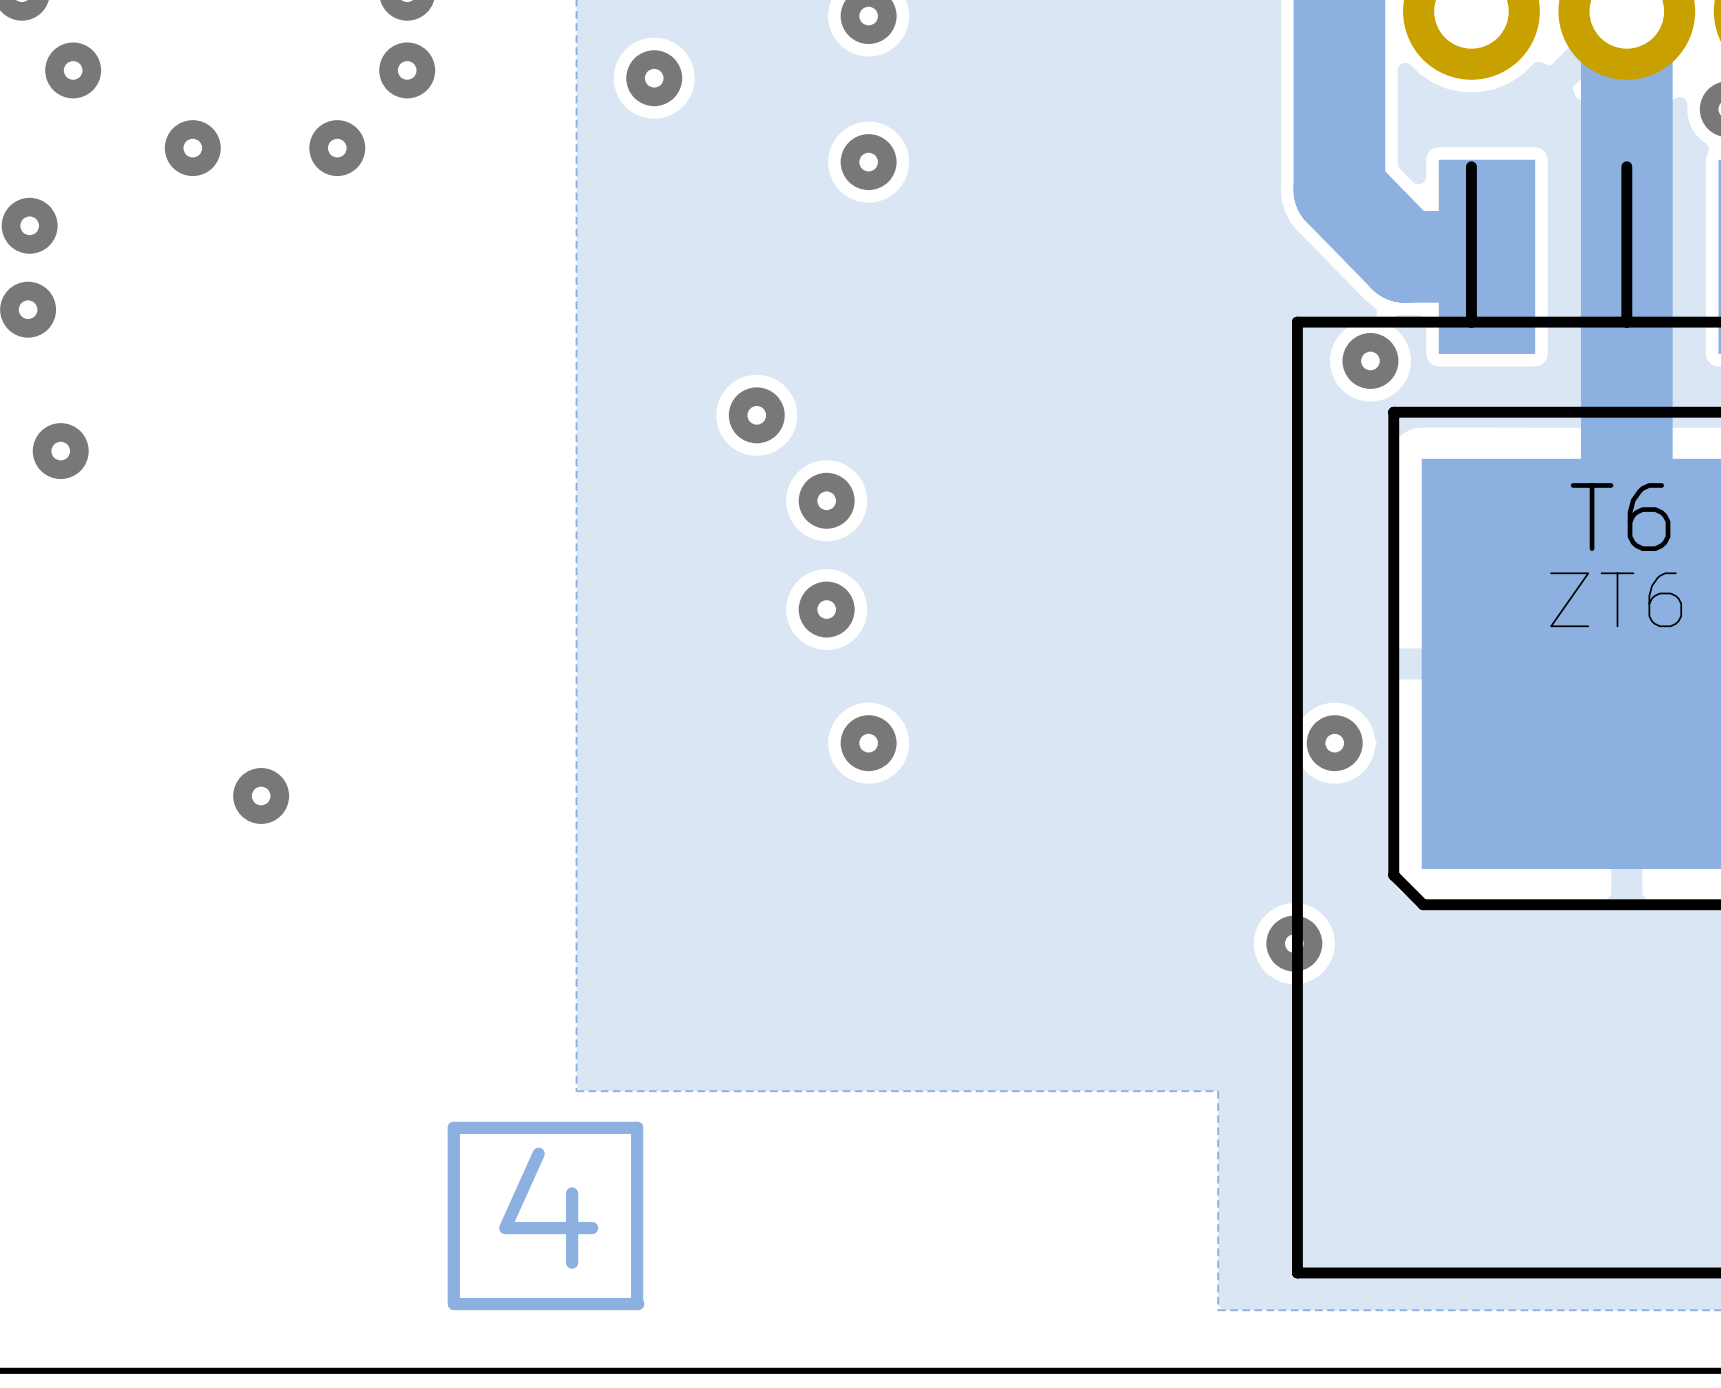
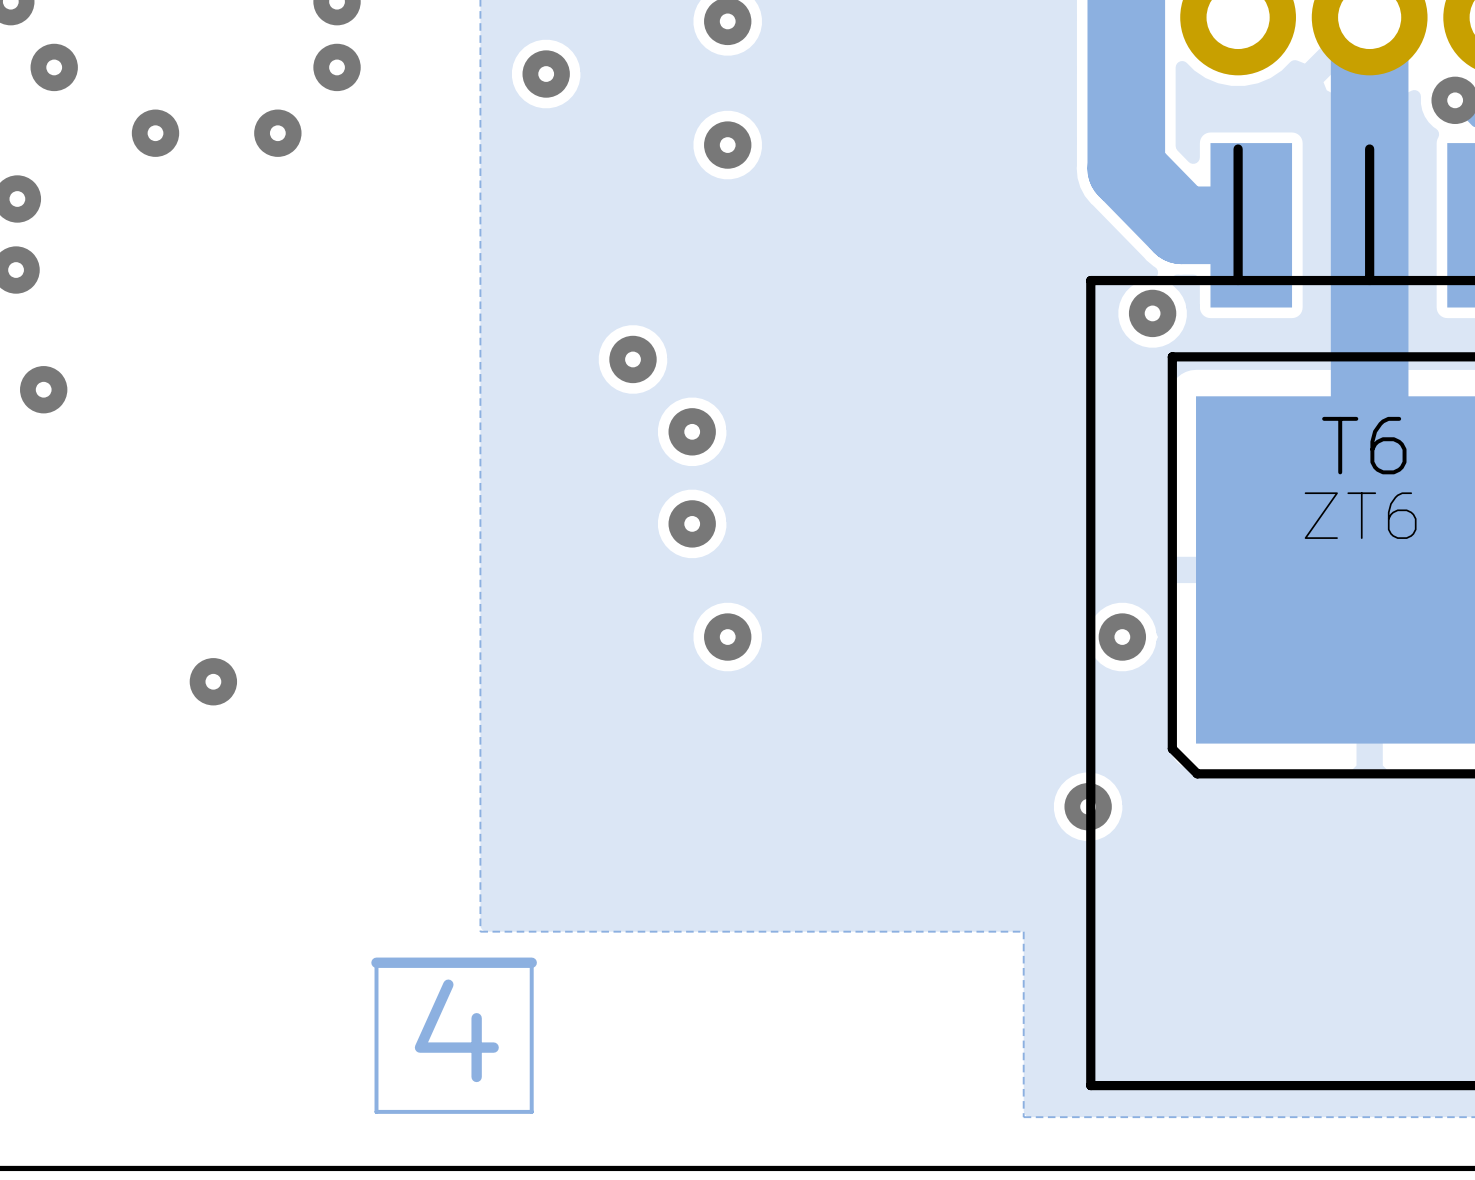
track width: thick (453, 1127) (453, 1304) -> thin (376, 962) (376, 1111)
track width: thick (637, 1127) (637, 1304) -> thin (531, 962) (531, 1111)
track width: thick (638, 1304) (454, 1304) -> thin (532, 1111) (377, 1111)

